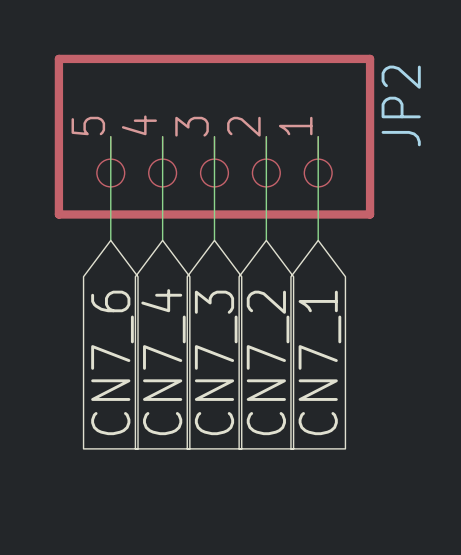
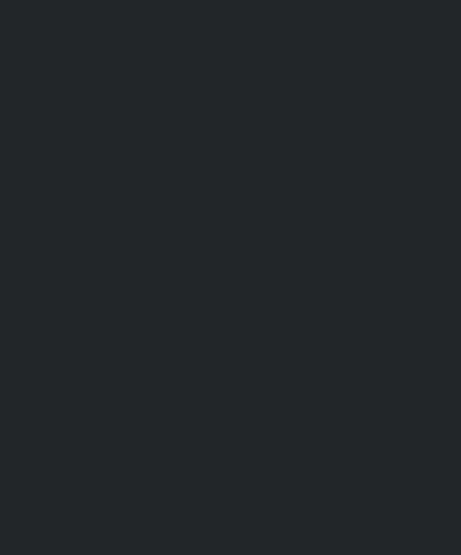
wire: (110, 136) (110, 240) -> none
wire: (162, 136) (162, 240) -> none
wire: (214, 136) (214, 240) -> none
JP2: (214, 136) -> none
wire: (266, 136) (266, 240) -> none
wire: (318, 136) (318, 240) -> none
global label: CN7_6 (112, 362) -> none
global label: CN7_4 (163, 362) -> none
global label: CN7_3 (216, 362) -> none
global label: CN7_2 (268, 362) -> none
global label: CN7_1 (319, 362) -> none

